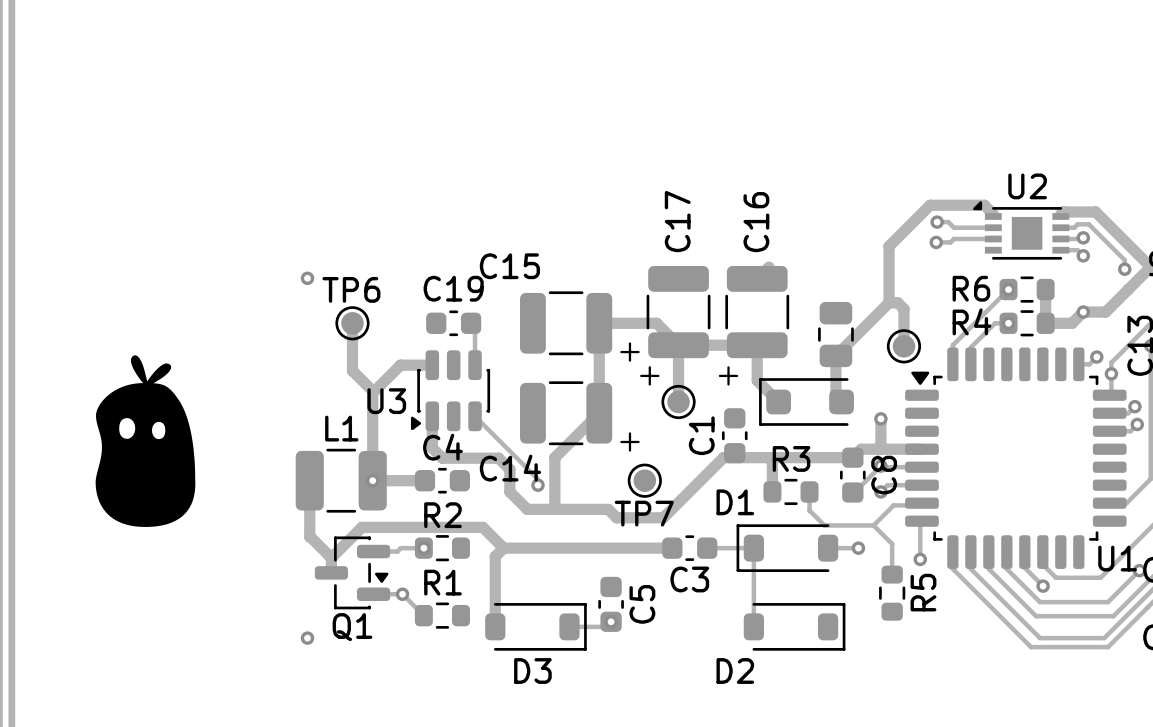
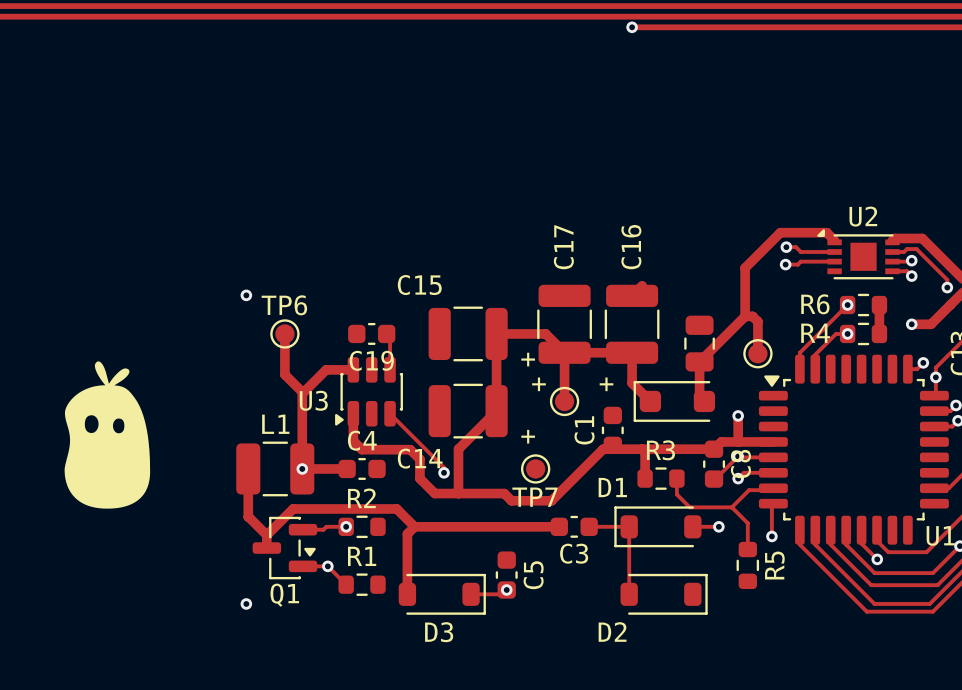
C19 name position: C19 (453, 288) -> C19 (371, 360)
track: (1083, 312) (1072, 323) (1045, 323) -> none

